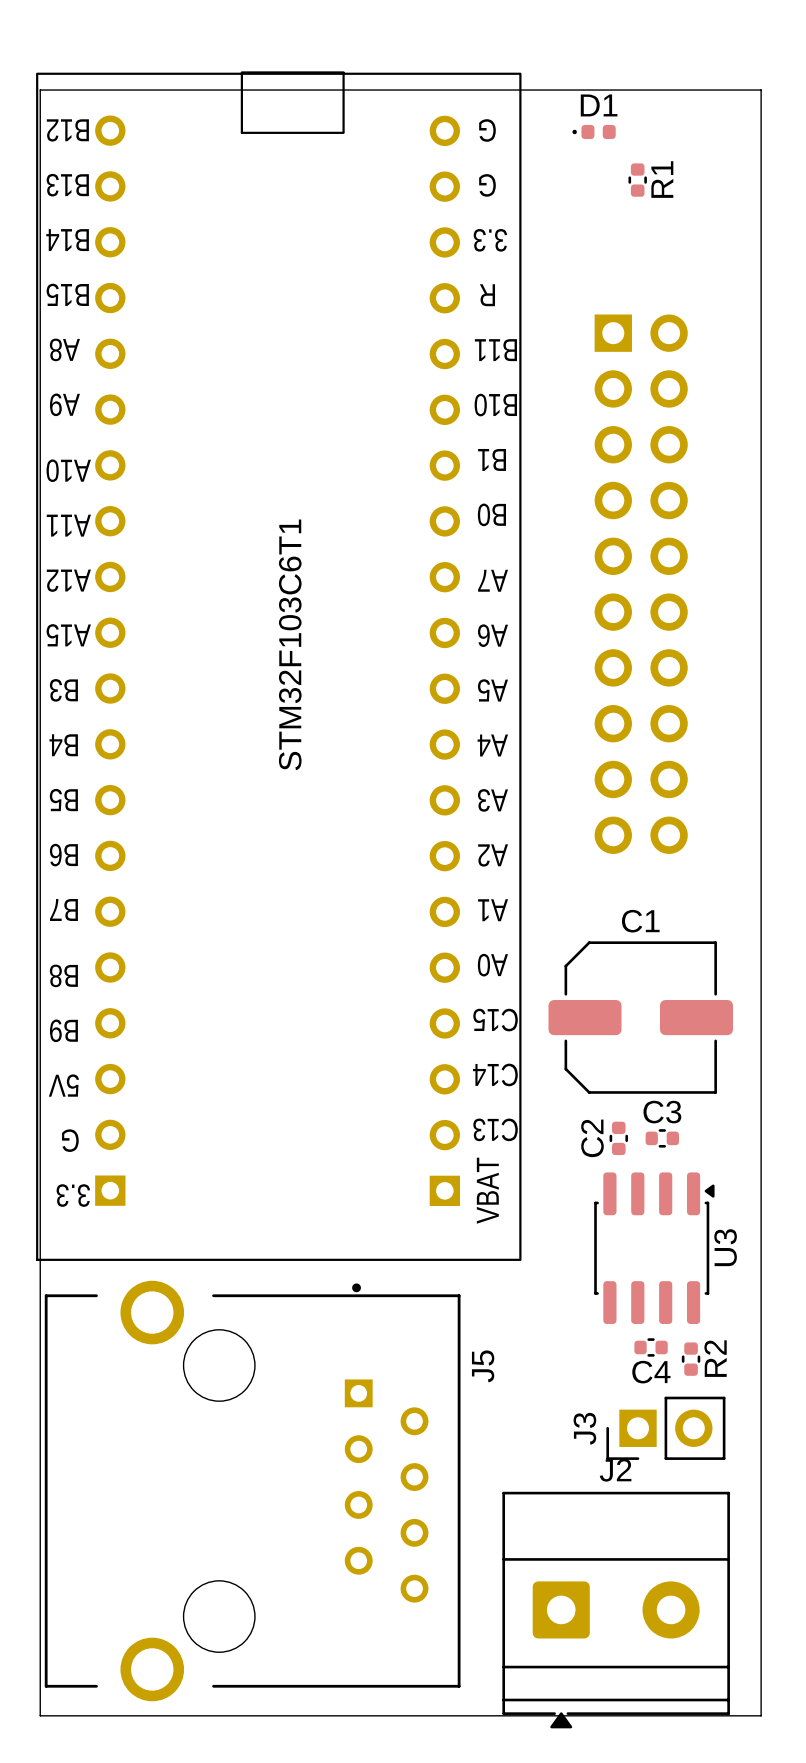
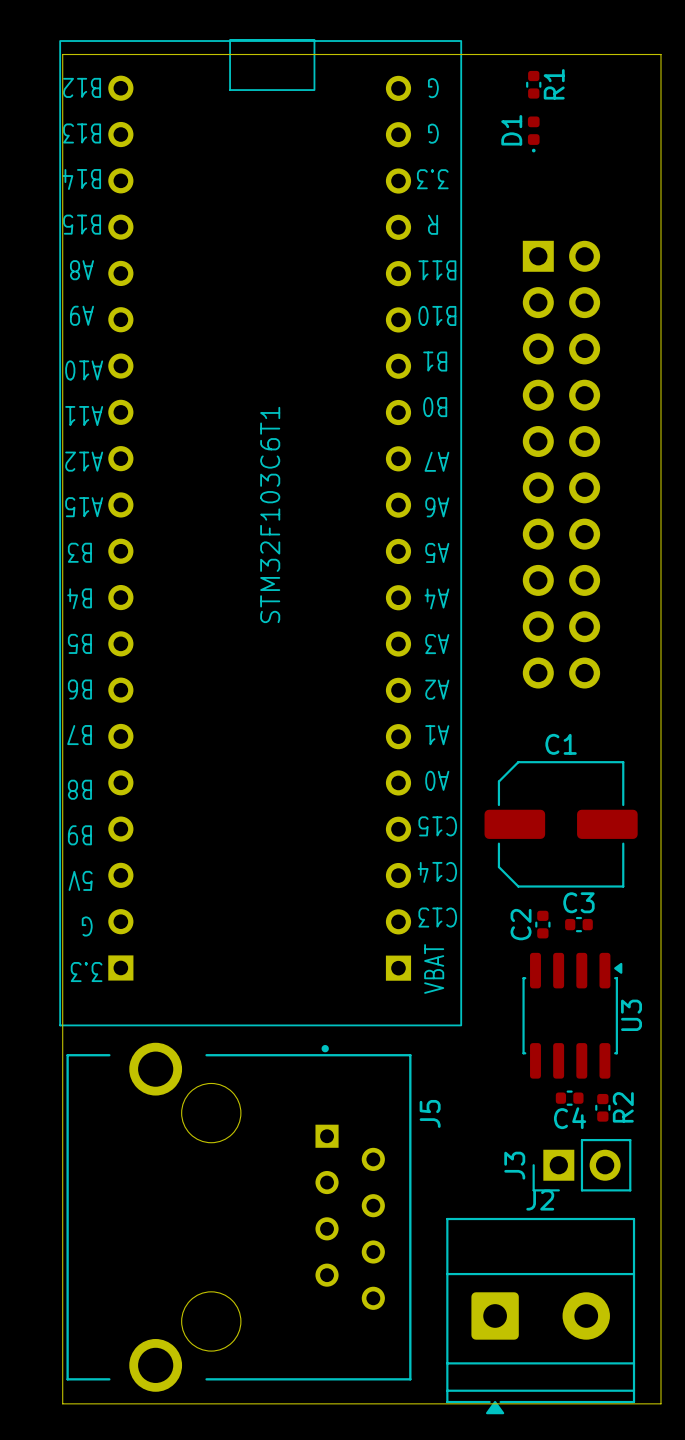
D1 rotation: 0° (594, 131) -> 90° counterclockwise (533, 134)
D1 position: (594, 131) -> (533, 134)
R1 position: (637, 180) -> (533, 84)

